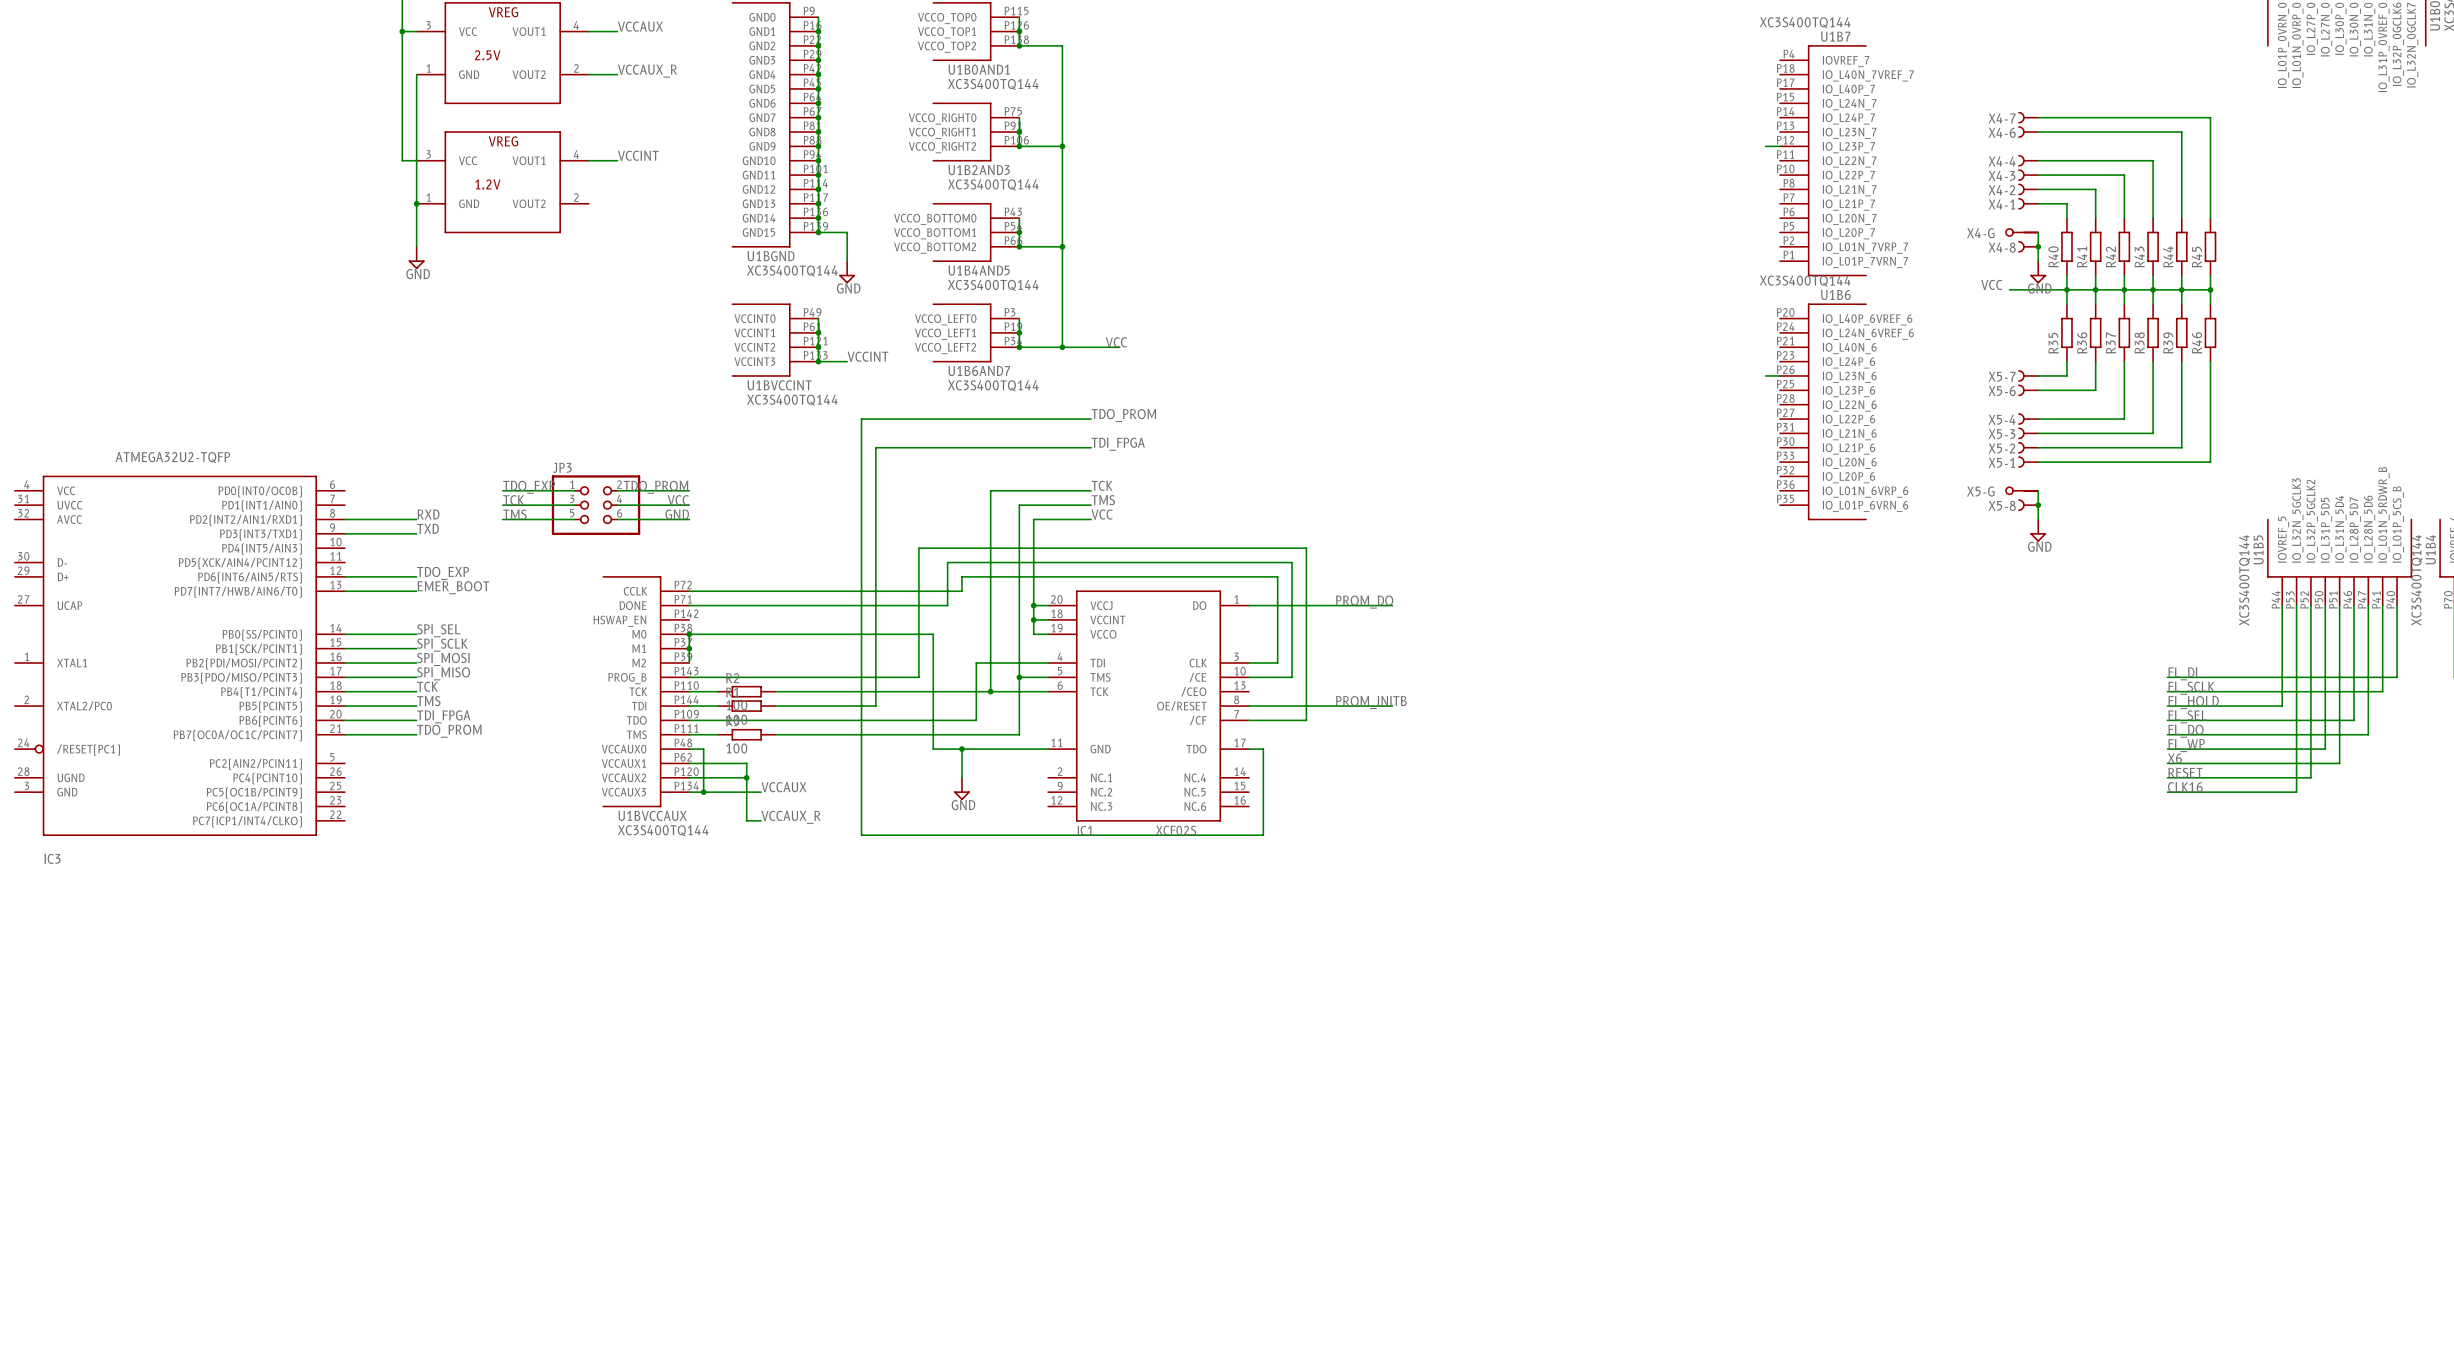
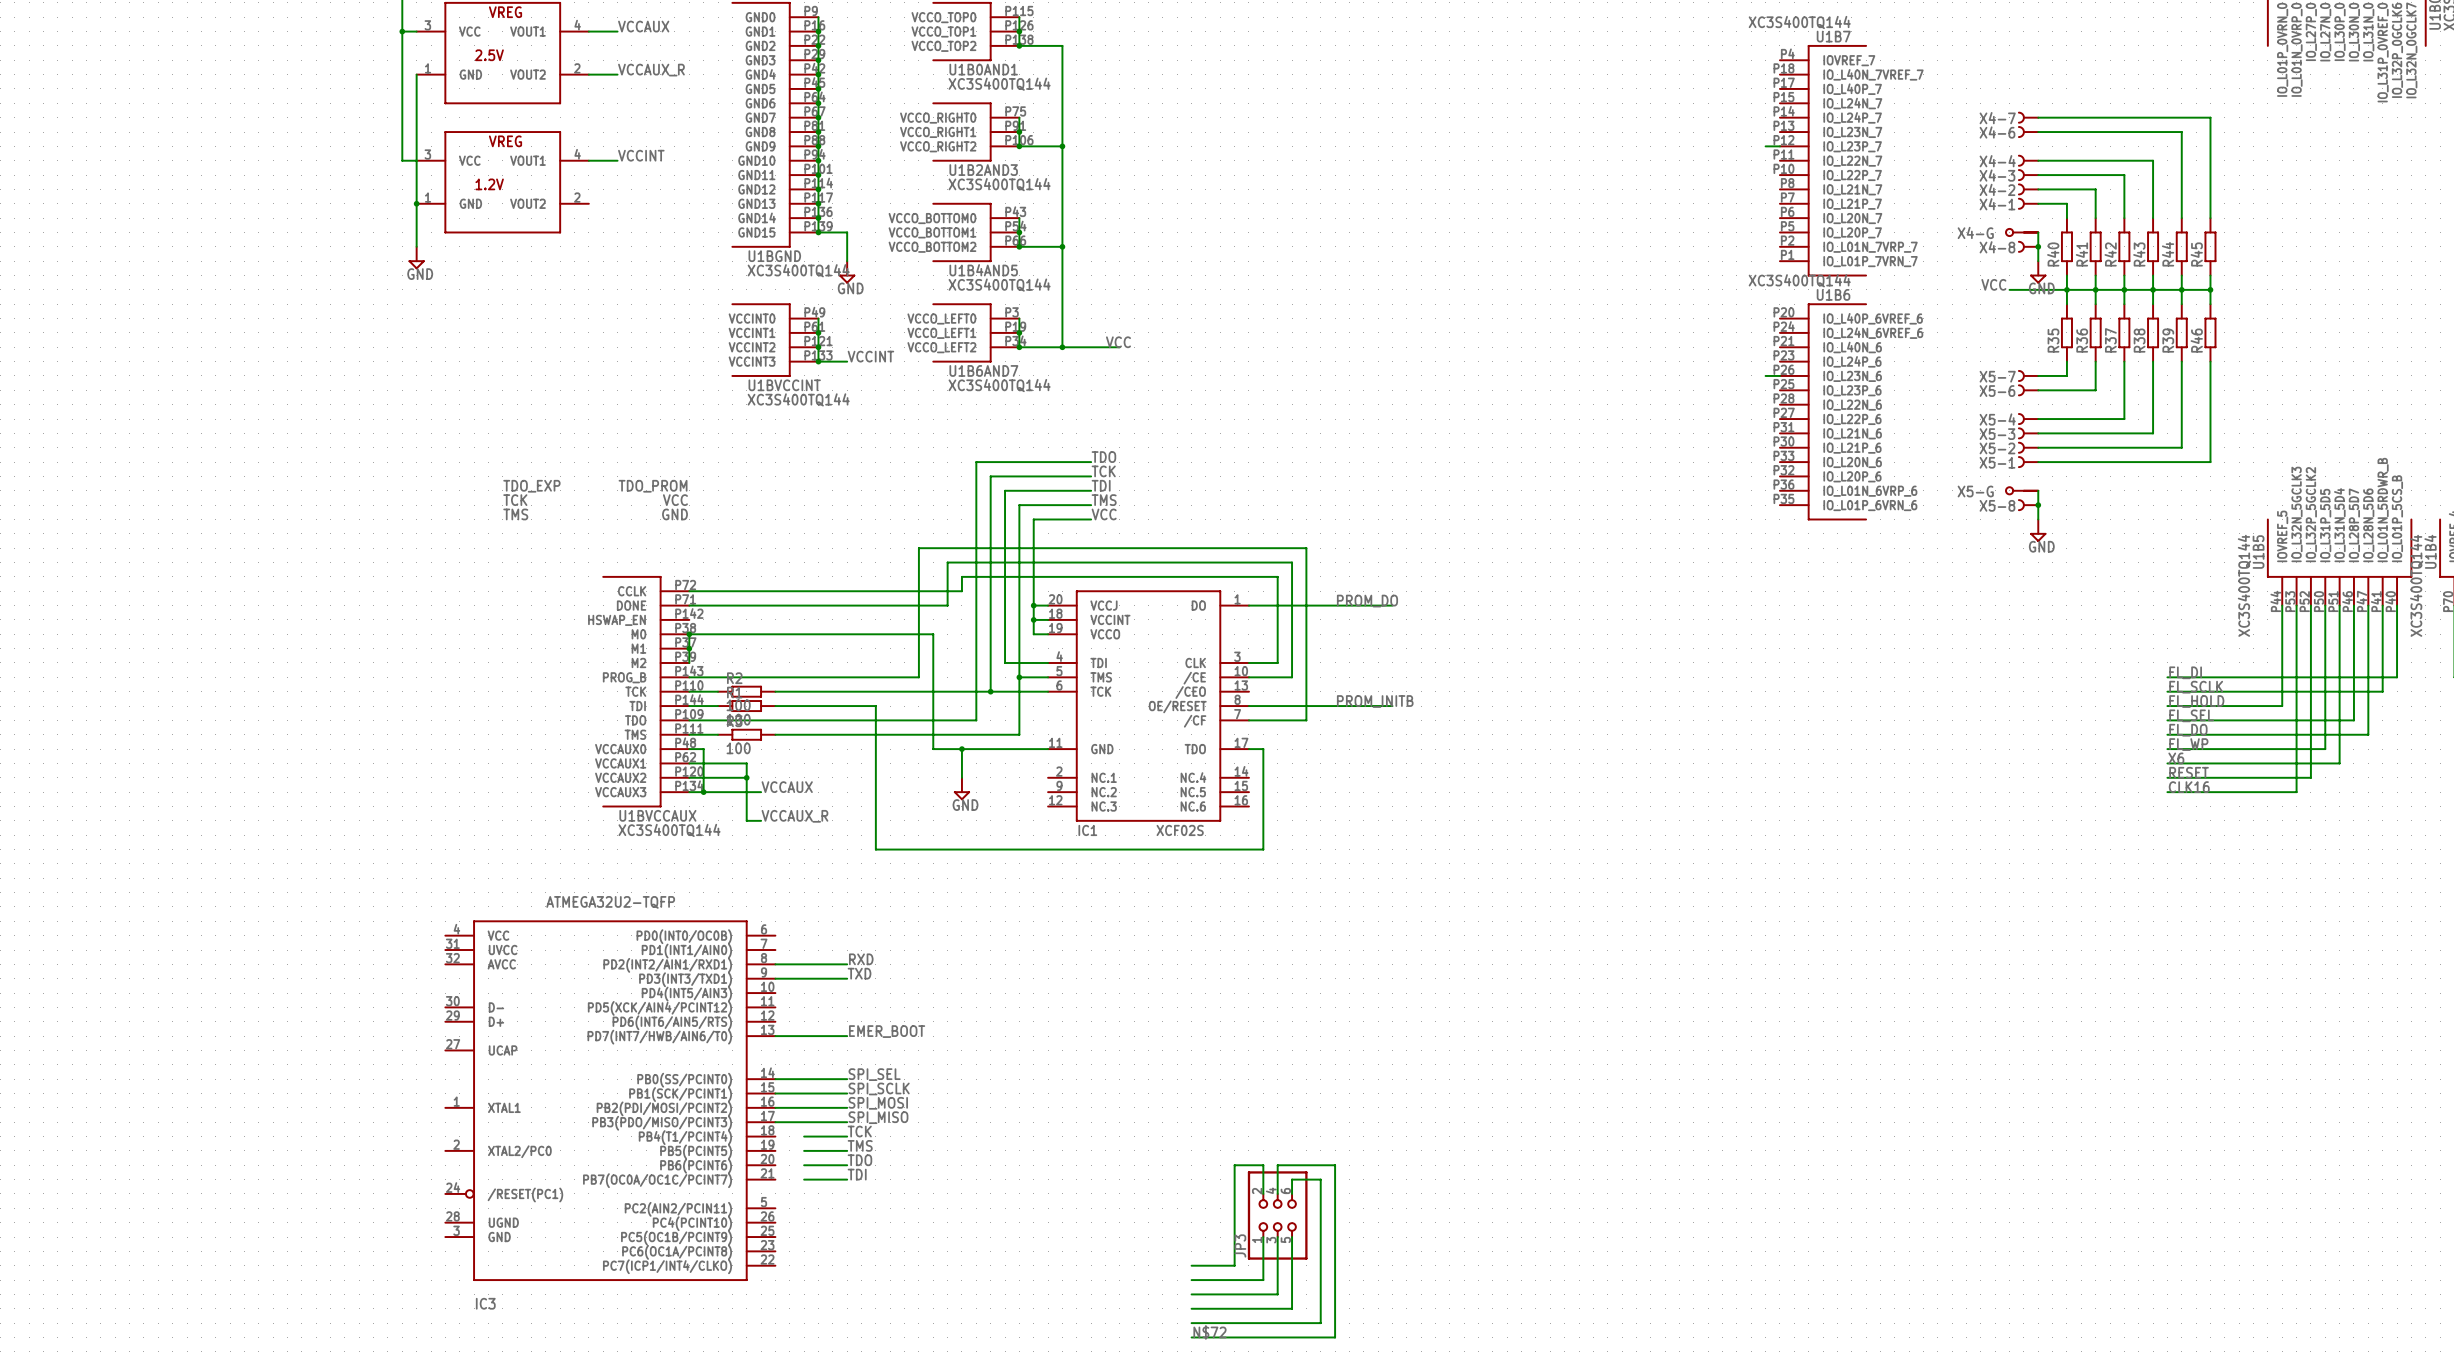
label: TDO_PROM (1123, 415) -> none
wire: (1091, 419) (861, 419) (861, 835) (1263, 835) -> (875, 706) (875, 849) (1263, 849) (1263, 835)
label: TDI_FPGA (1118, 444) -> none
wire: (1091, 447) (875, 447) (875, 706) -> none
label: none -> TDO (1103, 457)
wire: none -> (1091, 462) (976, 462) (976, 662)
label: none -> TCK (1103, 471)
label: TCK (1102, 485) -> TDI (1101, 485)
wire: (502, 490) (574, 490) -> none
wire: (617, 490) (689, 490) -> none
wire: (990, 490) (1005, 490) -> (990, 490) (990, 476) (1091, 476)
wire: (502, 505) (574, 505) -> none
JP3 rotation: 0° (596, 505) -> 90° counterclockwise (1277, 1215)
JP3 position: (596, 505) -> (1277, 1215)
wire: (617, 505) (689, 505) -> none
label: RXD (428, 514) -> none
wire: (344, 519) (416, 519) -> none
wire: (502, 519) (574, 519) -> none
wire: (617, 519) (689, 519) -> none
label: TXD (428, 528) -> none
wire: (344, 533) (416, 533) -> none
label: TDO_EXP (443, 573) -> none
wire: (344, 576) (416, 576) -> none
label: EMER_BOOT (453, 587) -> none
wire: (344, 591) (416, 591) -> none
label: SPI_SEL (438, 630) -> none
wire: (344, 634) (416, 634) -> none
label: SPI_SCLK (442, 645) -> none
wire: (344, 648) (416, 648) -> none
IC3 position: (179, 655) -> (610, 1100)
label: SPI_MOSI (443, 659) -> none
wire: (344, 662) (416, 662) -> none
wire: (976, 662) (1005, 662) -> (1005, 490) (1005, 662)
label: SPI_MISO (443, 673) -> none
wire: (344, 677) (416, 677) -> none
label: TCK (427, 686) -> none
wire: (344, 691) (416, 691) -> none
label: TMS (428, 701) -> none
wire: (344, 706) (416, 706) -> none
label: TDI_FPGA (443, 716) -> none
wire: (344, 720) (416, 720) -> none
label: TDO_PROM (449, 731) -> none
wire: (344, 734) (416, 734) -> none
label: none -> RXD (861, 959)
wire: none -> (775, 964) (847, 964)
label: none -> TXD (859, 973)
wire: none -> (775, 978) (847, 978)
label: none -> EMER_BOOT (887, 1031)
wire: none -> (775, 1036) (847, 1036)
label: none -> SPI_SEL (874, 1074)
wire: none -> (775, 1079) (847, 1079)
label: none -> SPI_SCLK (879, 1088)
wire: none -> (775, 1093) (847, 1093)
label: none -> SPI_MOSI (878, 1103)
wire: none -> (775, 1107) (847, 1107)
label: none -> SPI_MISO (878, 1117)
wire: none -> (775, 1122) (847, 1122)
label: none -> TCK (859, 1131)
wire: none -> (804, 1136) (847, 1136)
label: none -> TMS (860, 1145)
wire: none -> (804, 1150) (847, 1150)
label: none -> TDO (859, 1160)
wire: none -> (804, 1165) (847, 1165)
label: none -> TDI (857, 1174)
wire: none -> (804, 1179) (847, 1179)
wire: none -> (1263, 1193) (1263, 1165) (1234, 1165) (1234, 1265) (1191, 1265)
wire: none -> (1277, 1193) (1277, 1165) (1335, 1165) (1335, 1337) (1191, 1337)
wire: none -> (1292, 1193) (1292, 1179) (1320, 1179) (1320, 1323) (1191, 1323)
wire: none -> (1263, 1237) (1263, 1280) (1191, 1280)
wire: none -> (1277, 1237) (1277, 1294) (1191, 1294)
wire: none -> (1292, 1237) (1292, 1308) (1191, 1308)
label: none -> N$72 (1209, 1332)

